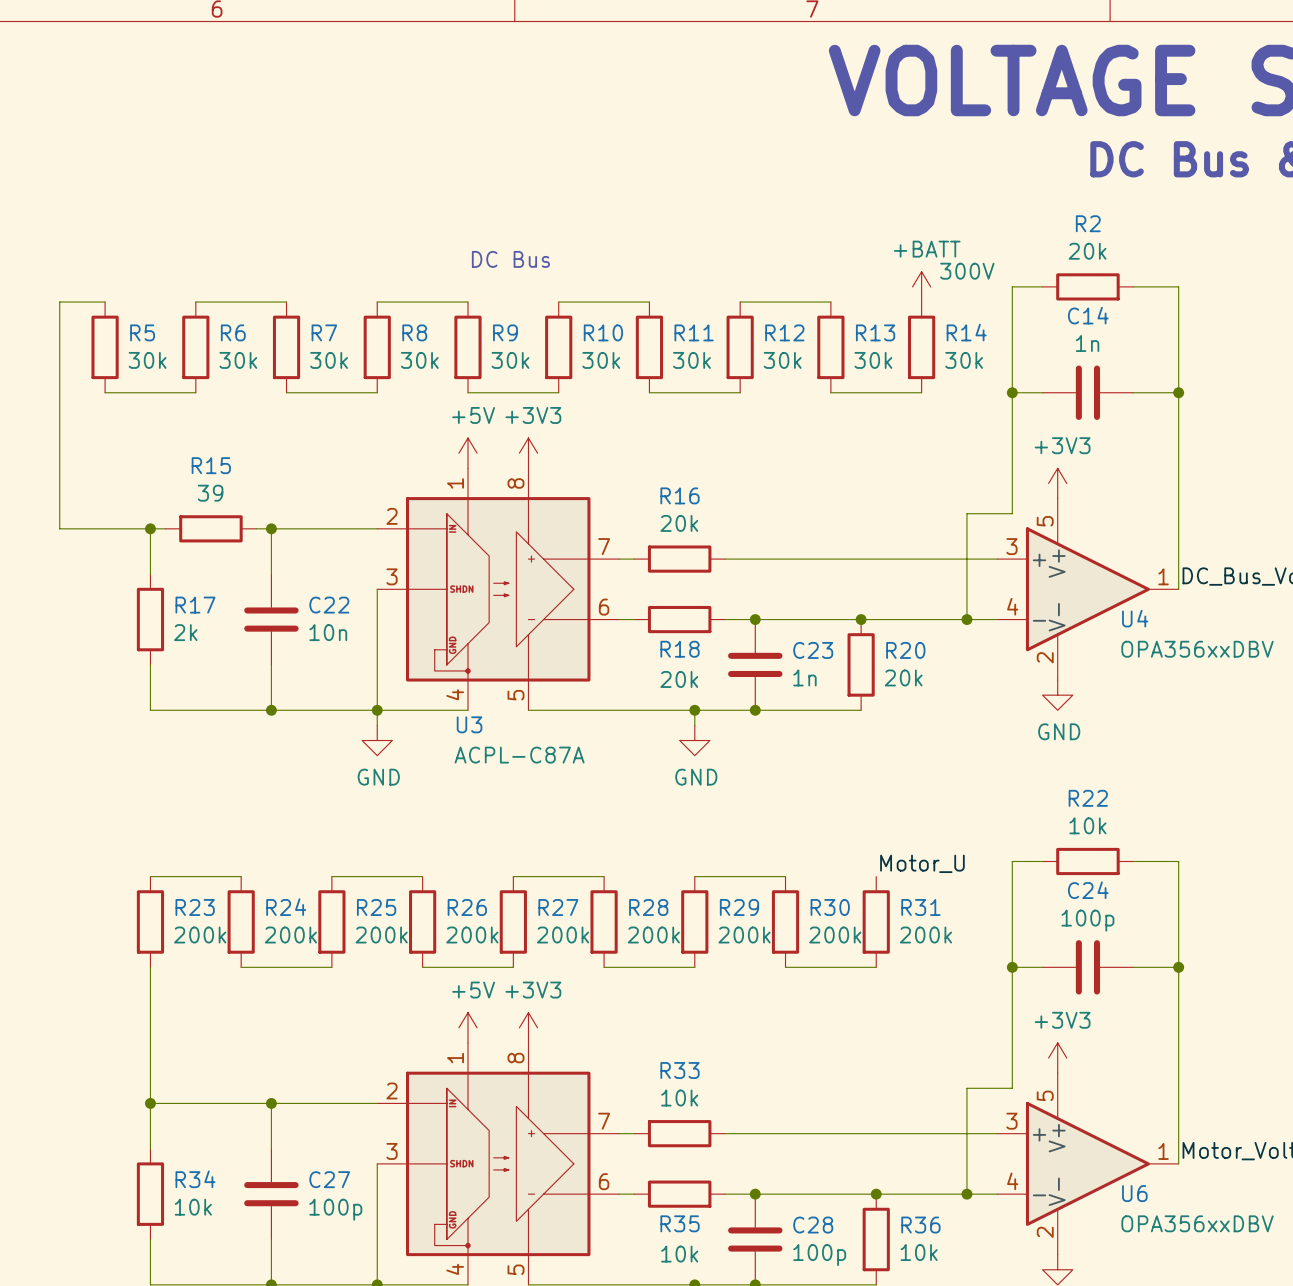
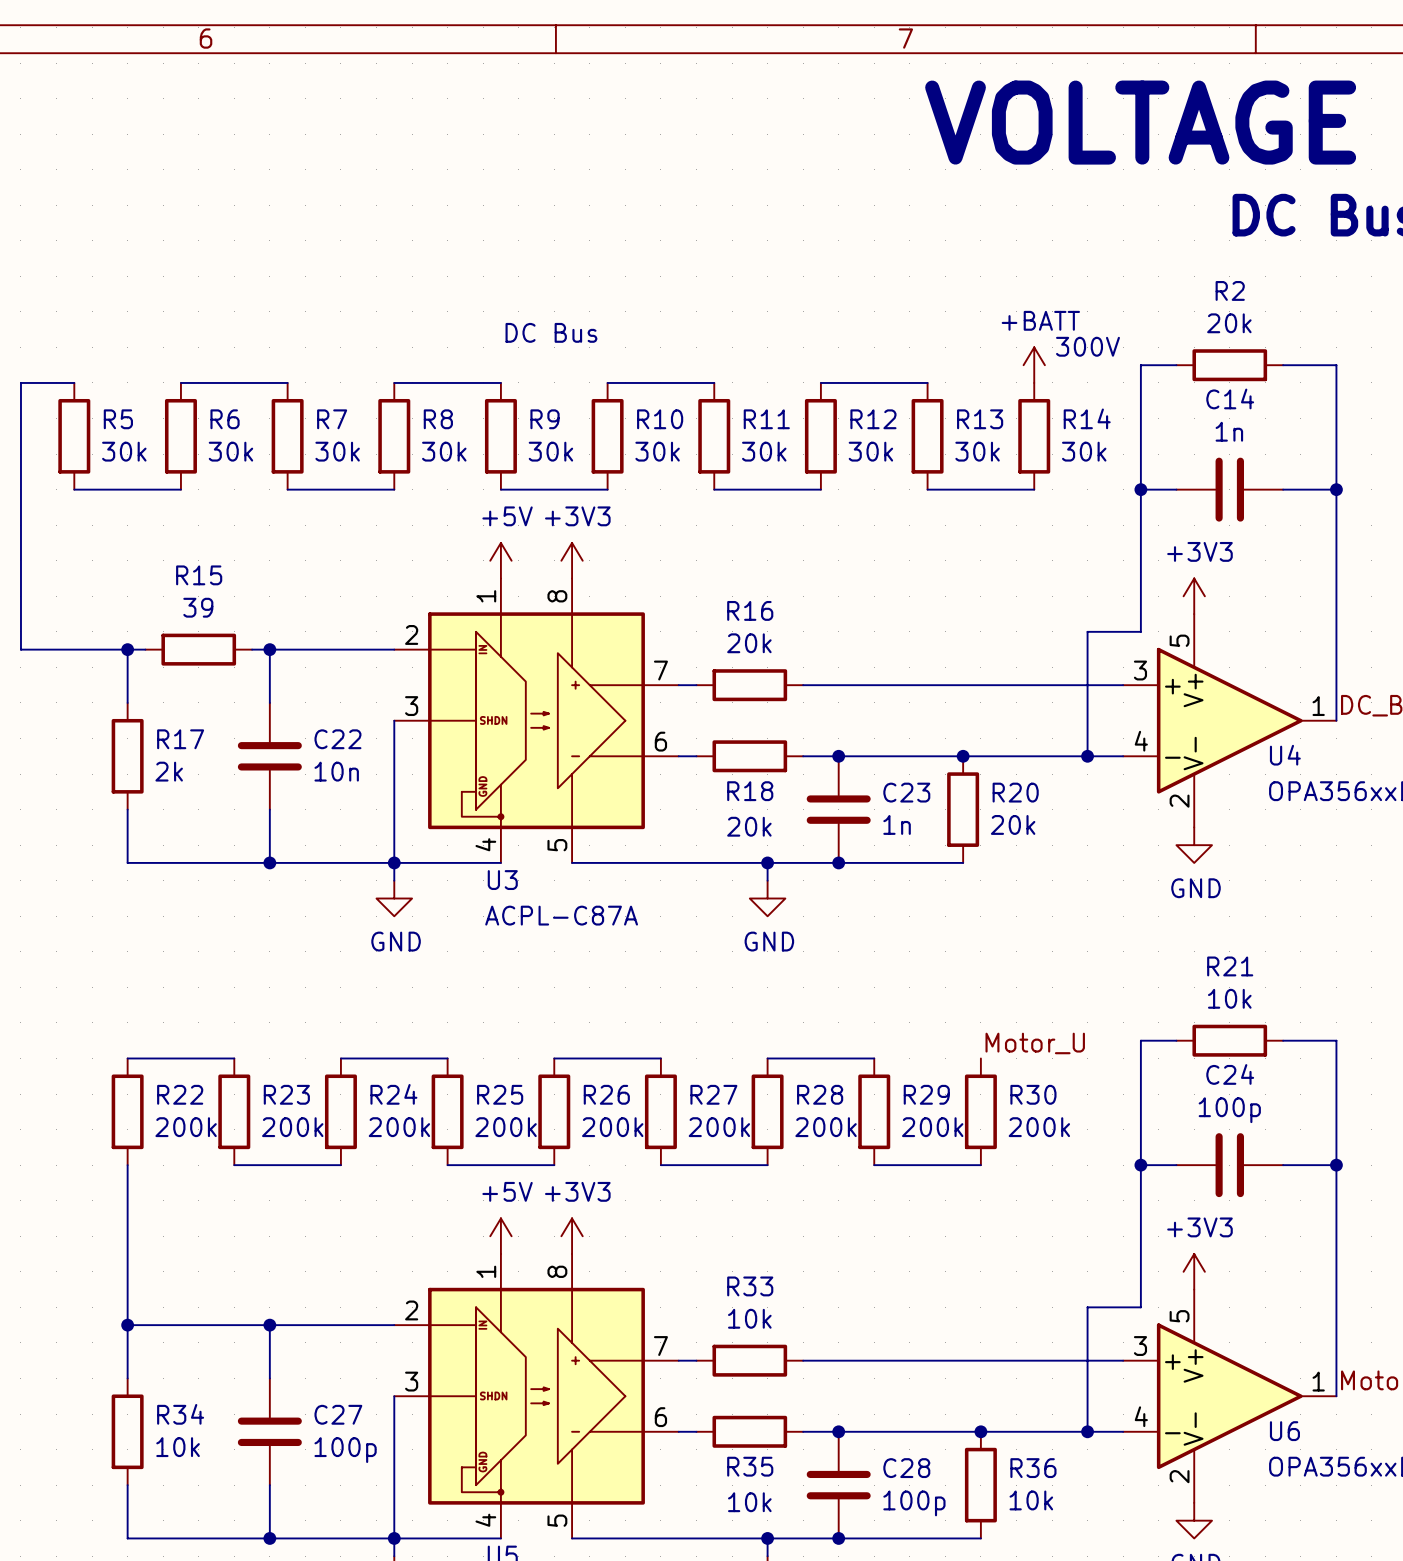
R22 name: R22 (1088, 798) -> R21 (1230, 966)
R23 name: R23 (195, 907) -> R22 (180, 1094)
R24 name: R24 (286, 907) -> R23 (286, 1094)
R25 name: R25 (376, 907) -> R24 (393, 1094)
R26 name: R26 (467, 907) -> R25 (500, 1094)
R27 name: R27 (558, 907) -> R26 (606, 1094)
R28 name: R28 (648, 907) -> R27 (713, 1094)
R29 name: R29 (739, 907) -> R28 (820, 1094)
R30 name: R30 (830, 907) -> R29 (926, 1094)
R31 name: R31 (920, 907) -> R30 (1033, 1094)

